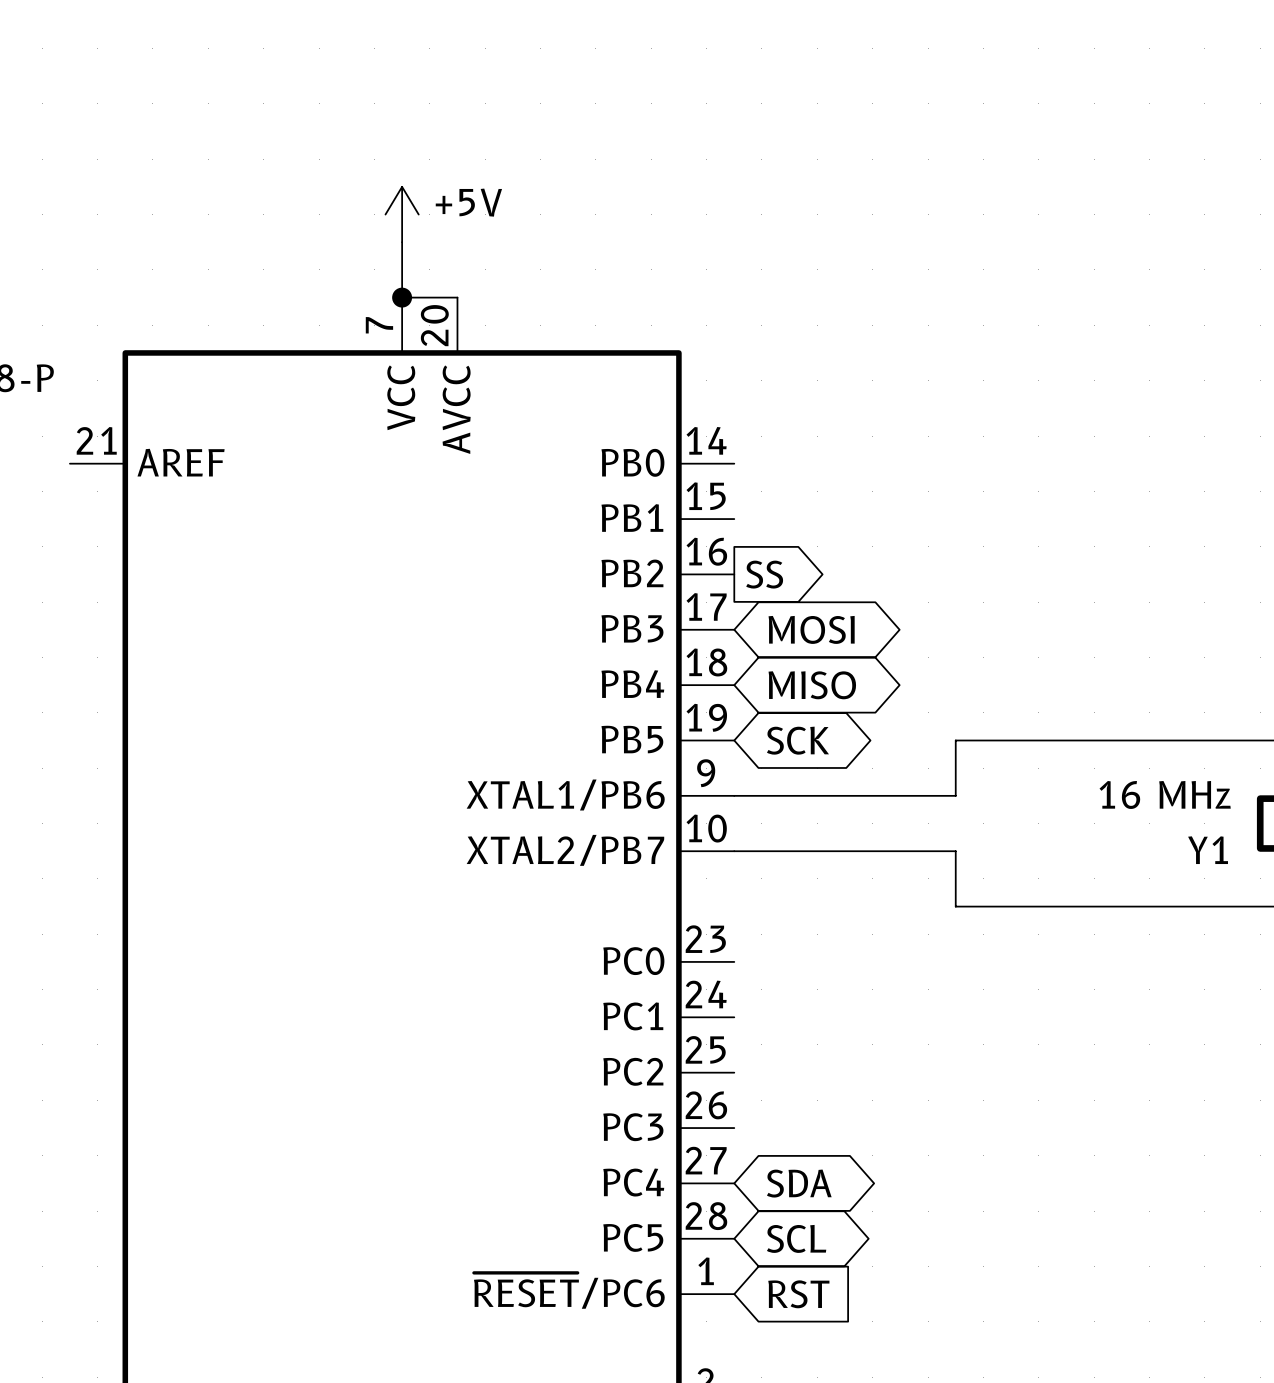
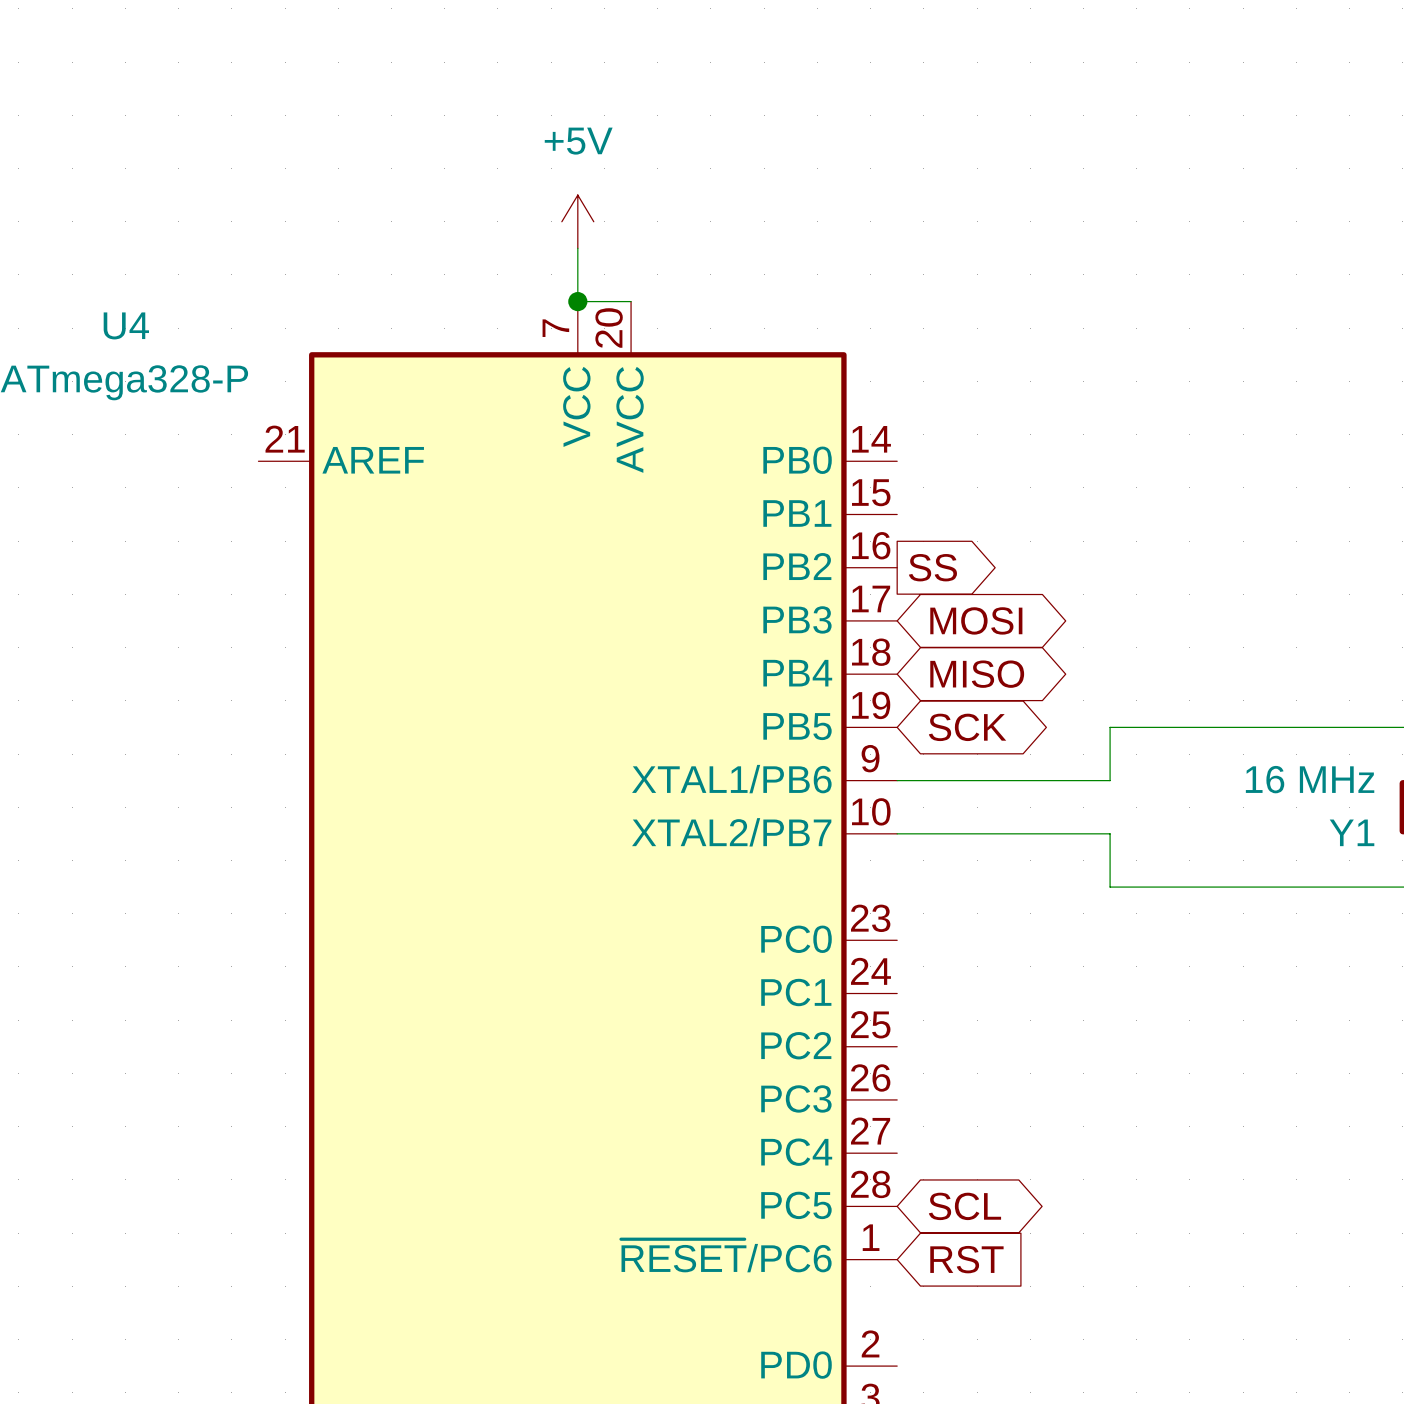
power symbol text position: +5V (468, 202) -> +5V (578, 141)
global label: SDA (799, 1183) -> none

